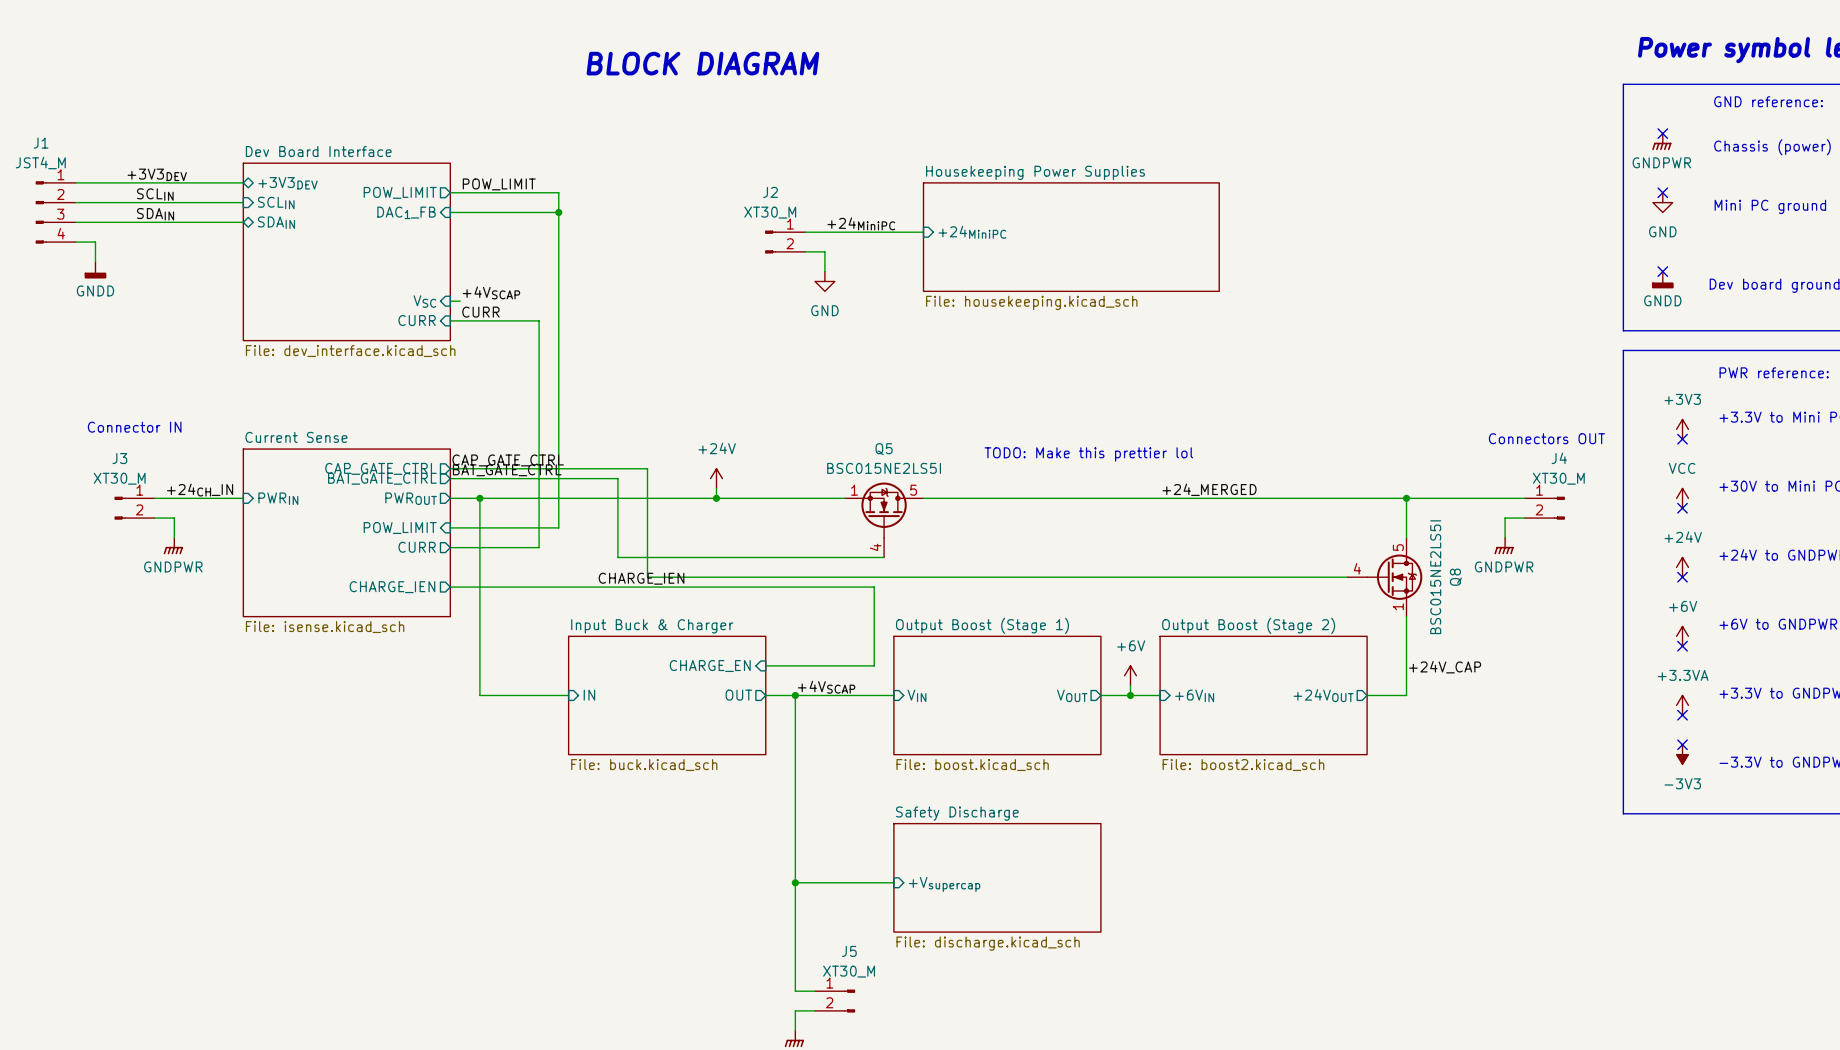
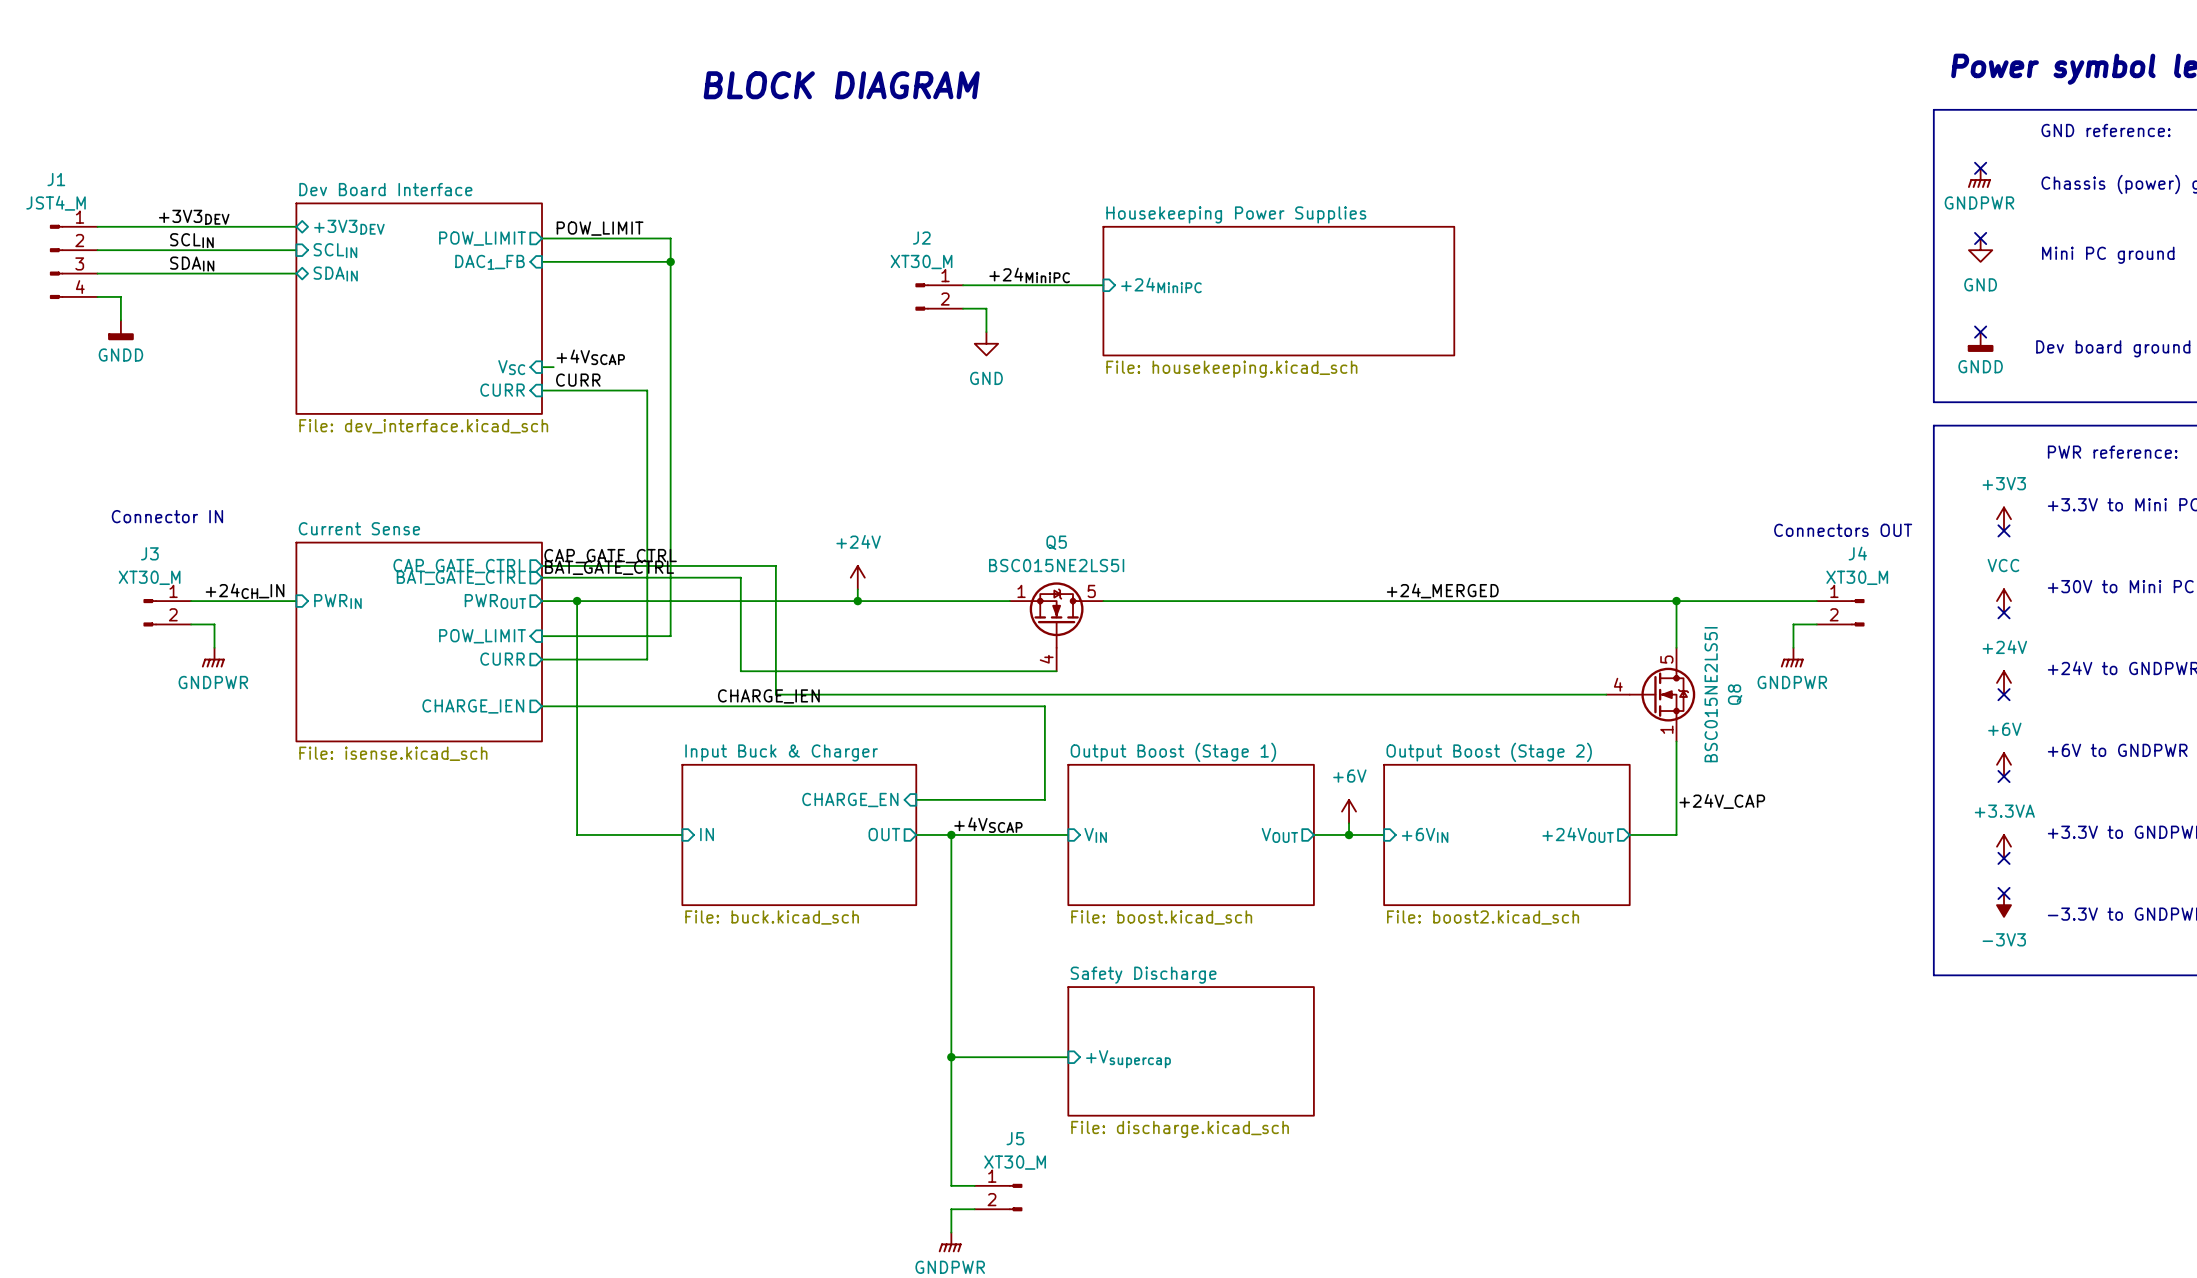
text: TODO: Make this prettier lol (1088, 454) -> none

